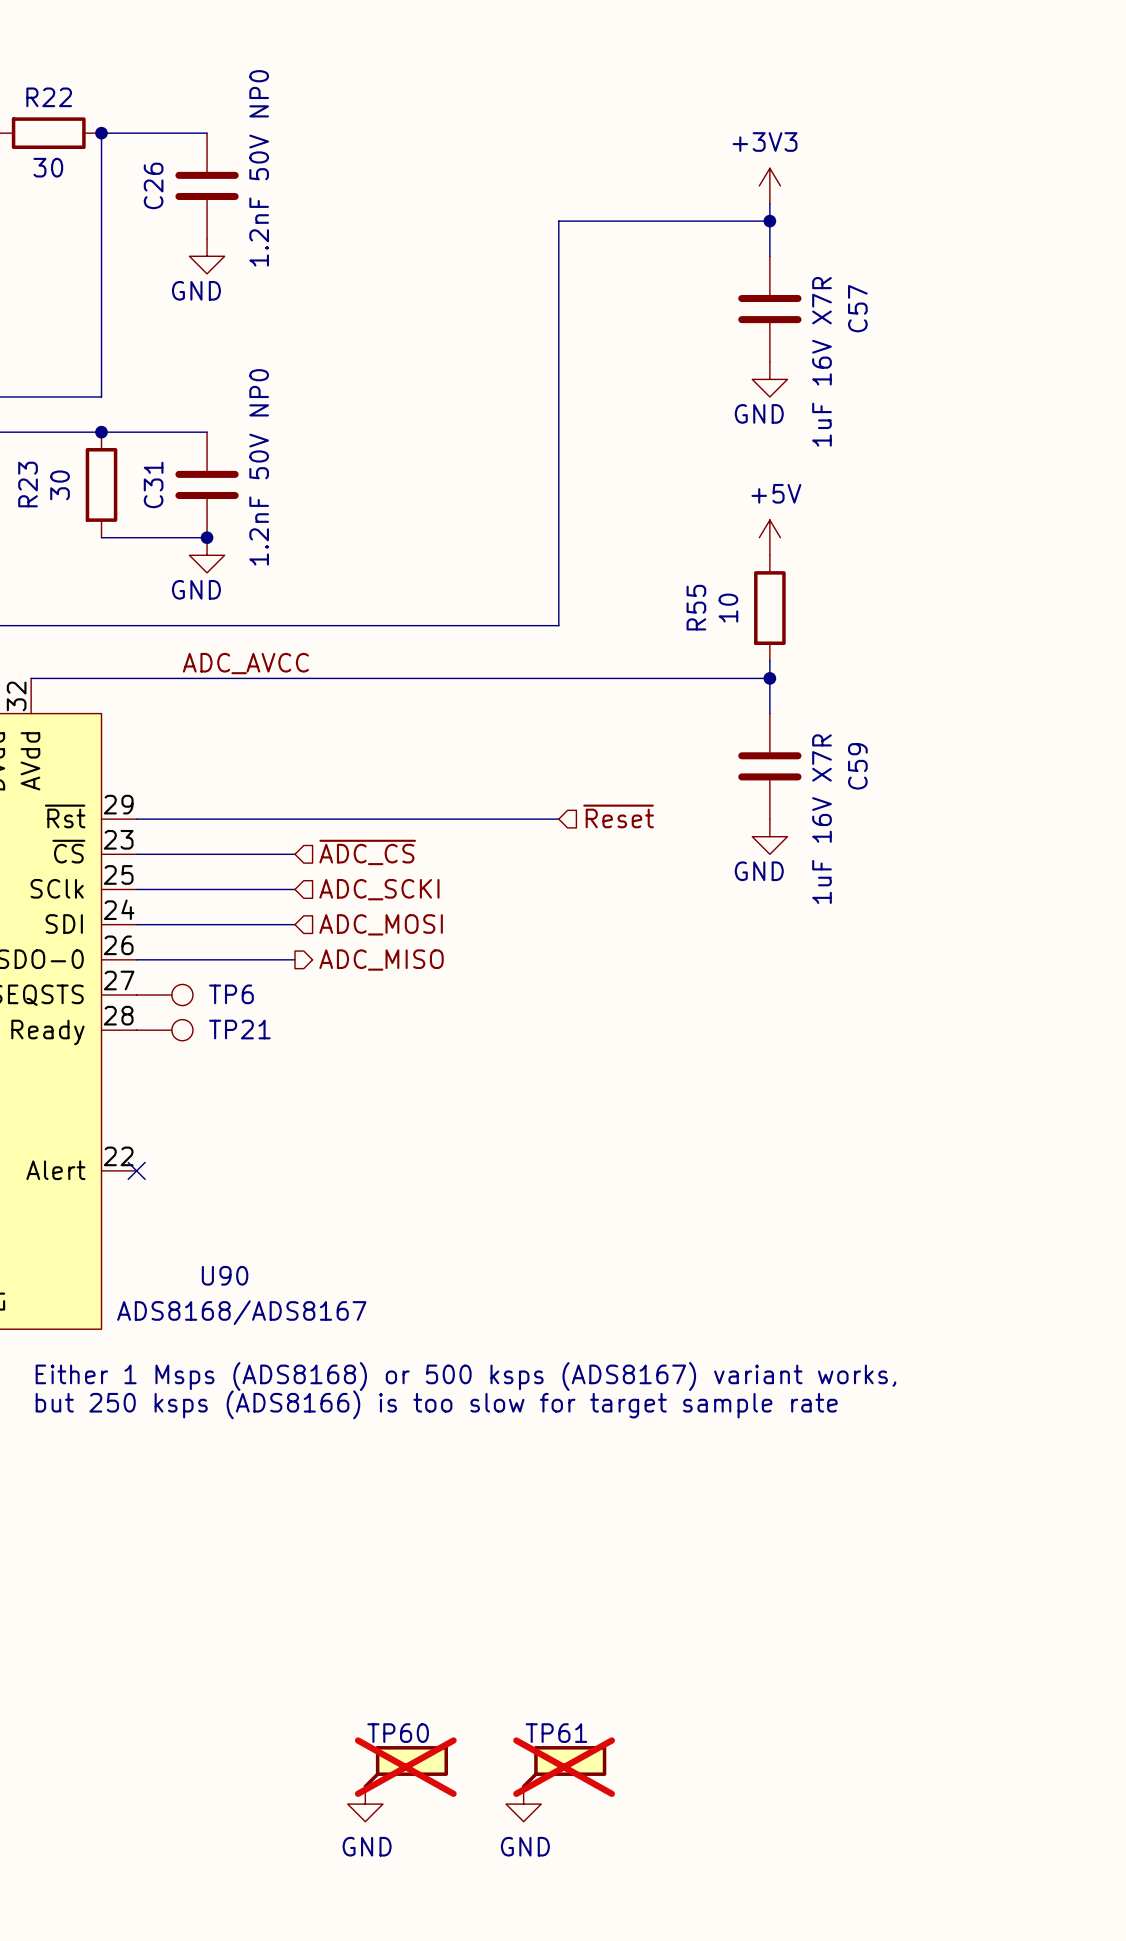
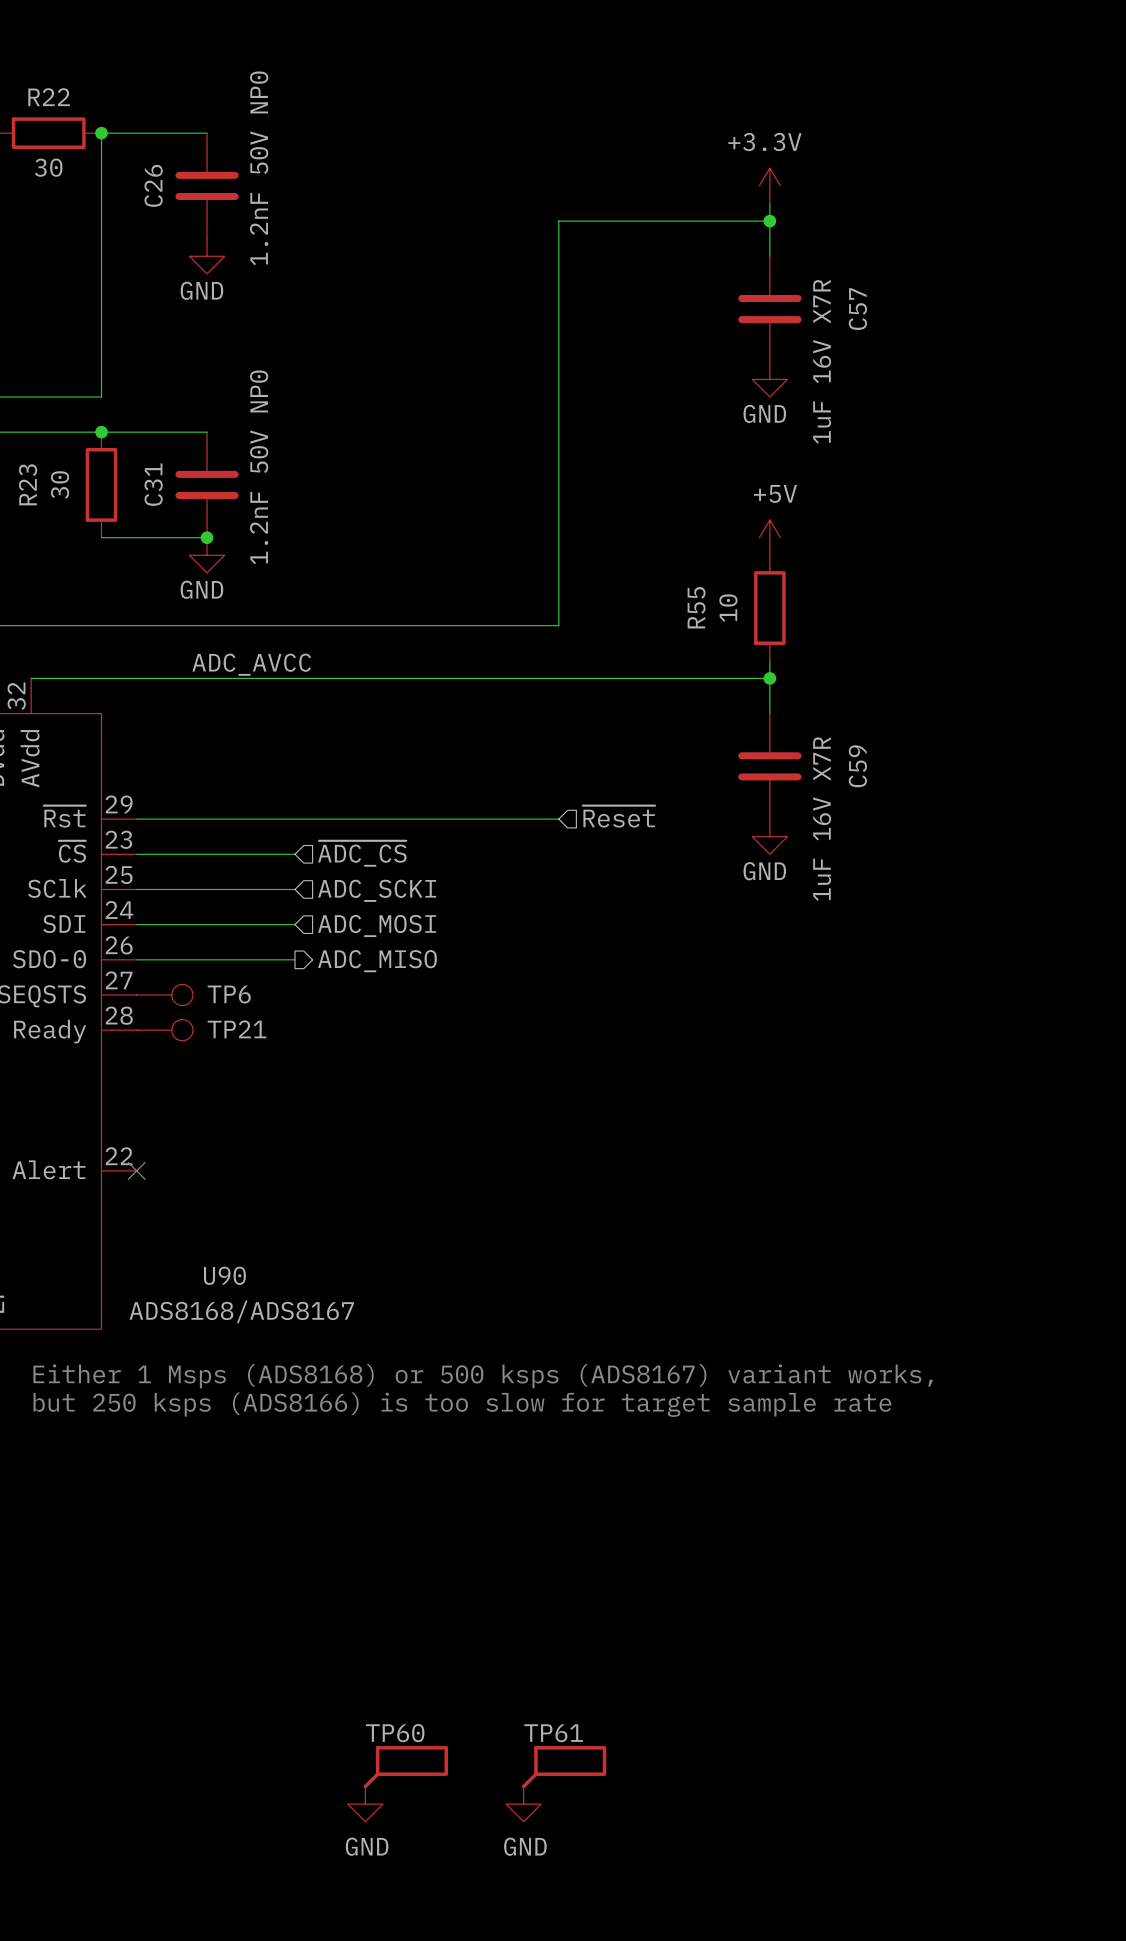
power symbol: +3V3 (769, 185) -> +3.3V (769, 185)
TP60 do-not-place cross: (405, 1767) -> none
TP61 do-not-place cross: (564, 1767) -> none

